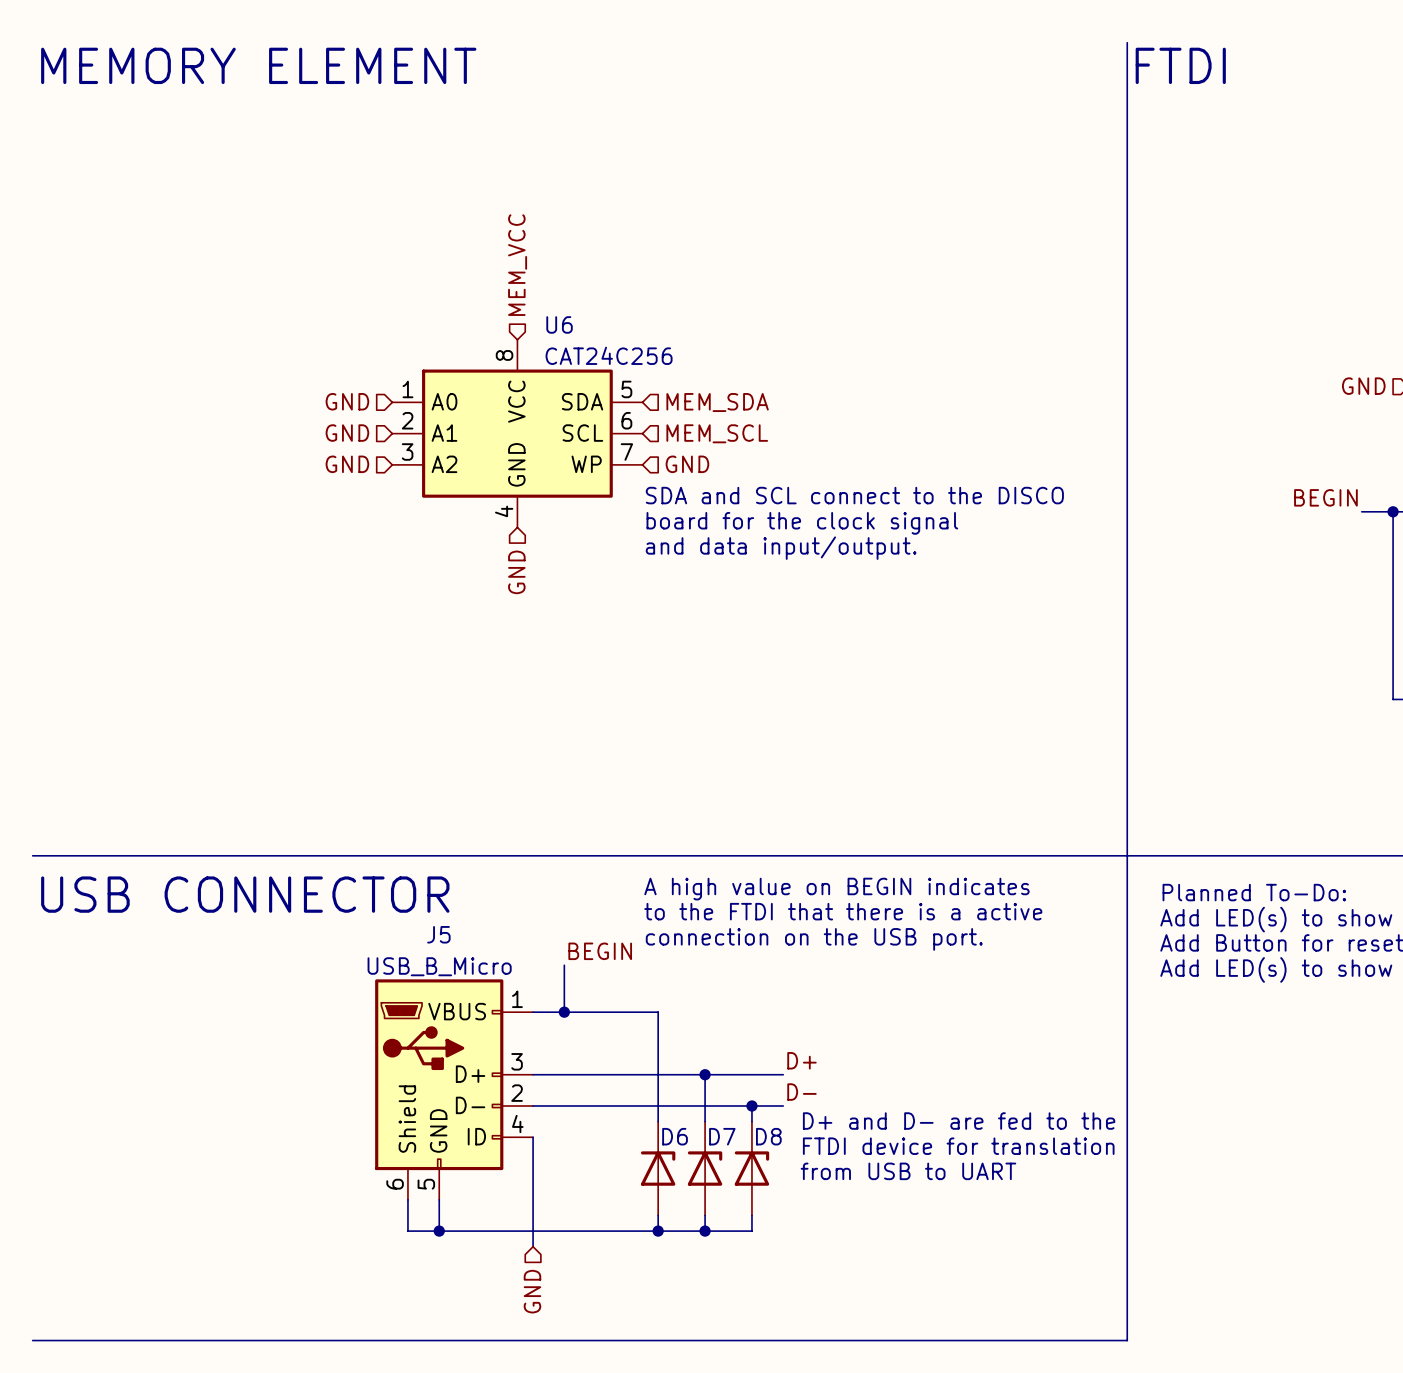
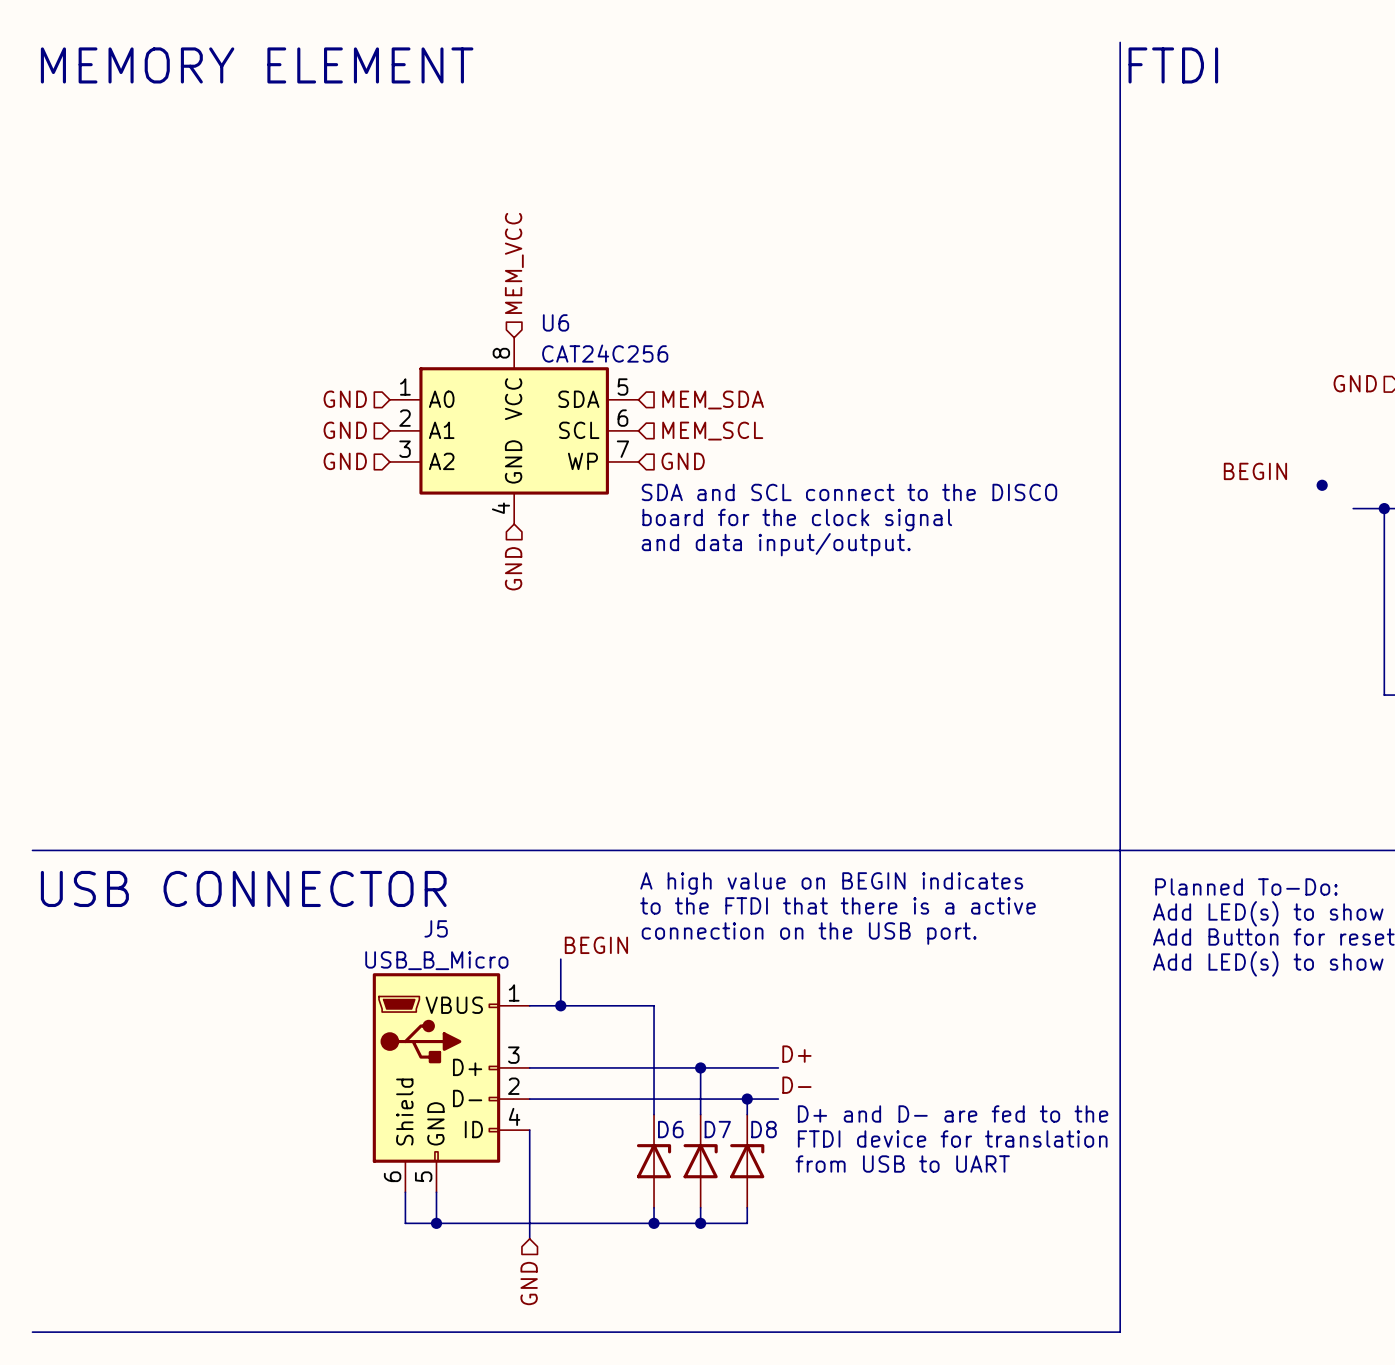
junction: none -> (1322, 485)
label position: BEGIN (1325, 497) -> BEGIN (1255, 471)

